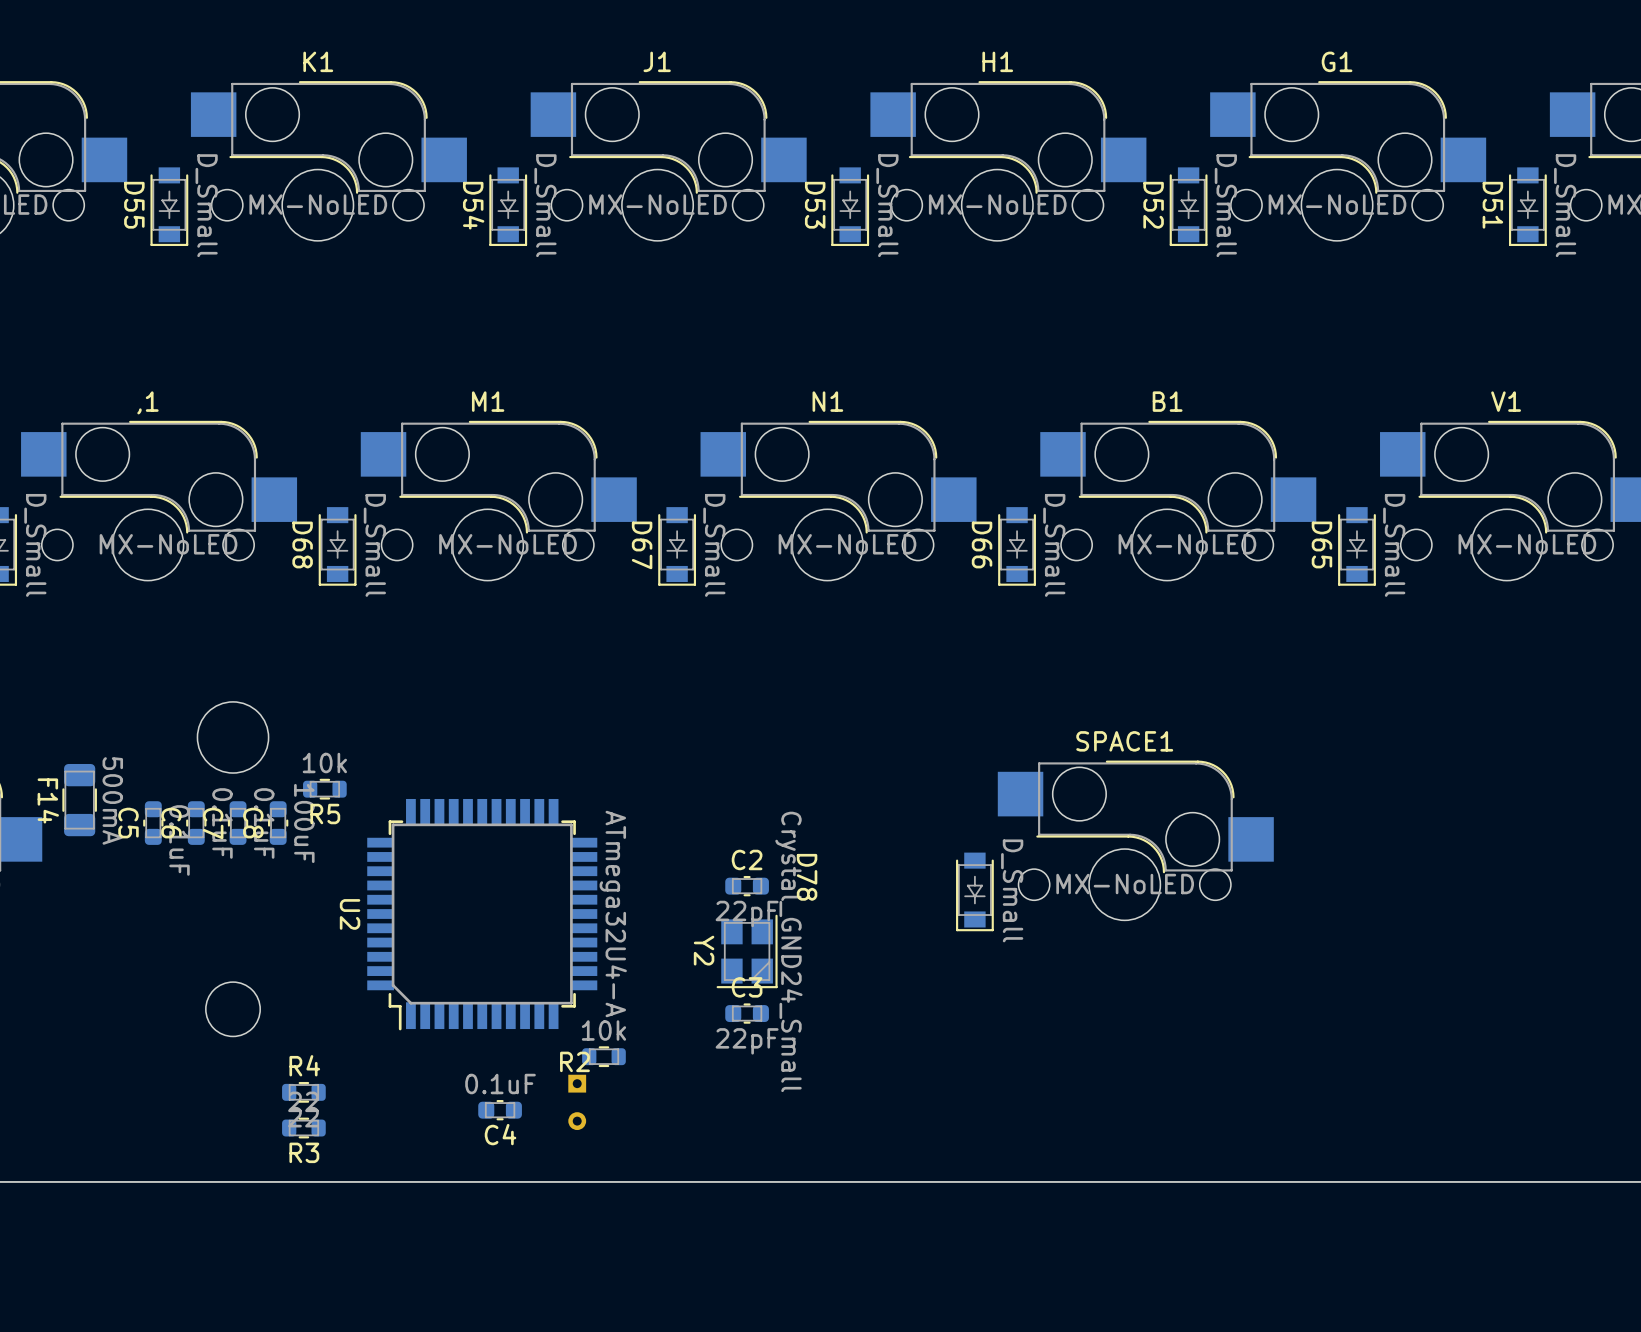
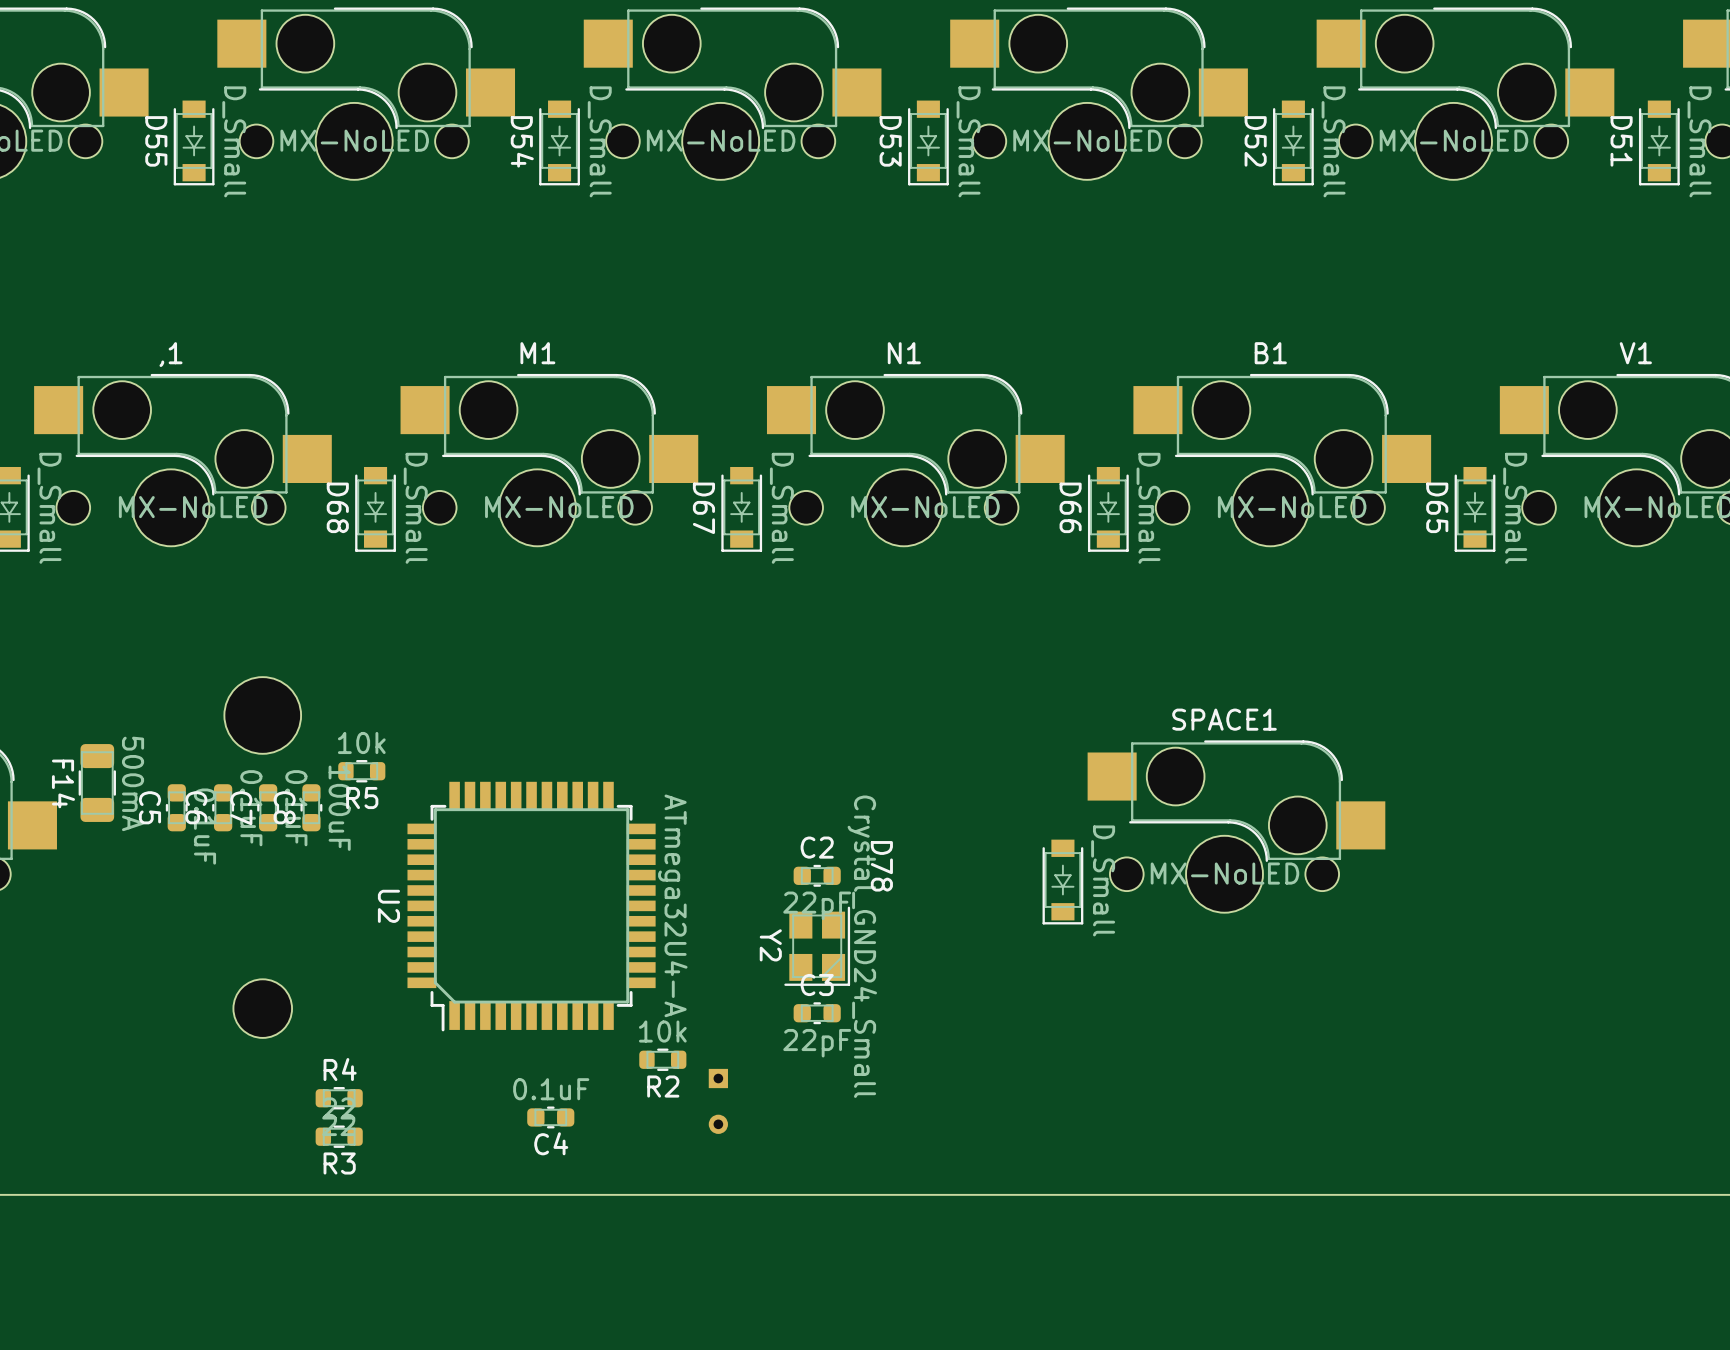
R2 name position: R2 (574, 1061) -> R2 (663, 1086)
part position: (577, 1083) -> (718, 1078)
part position: (577, 1121) -> (718, 1124)

